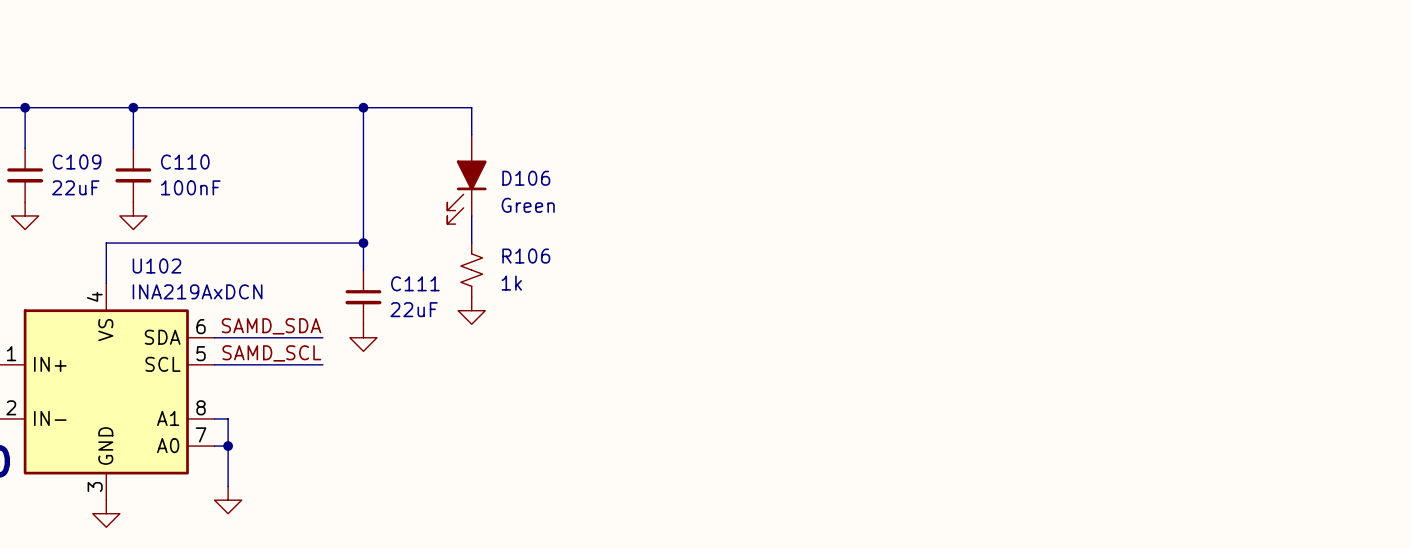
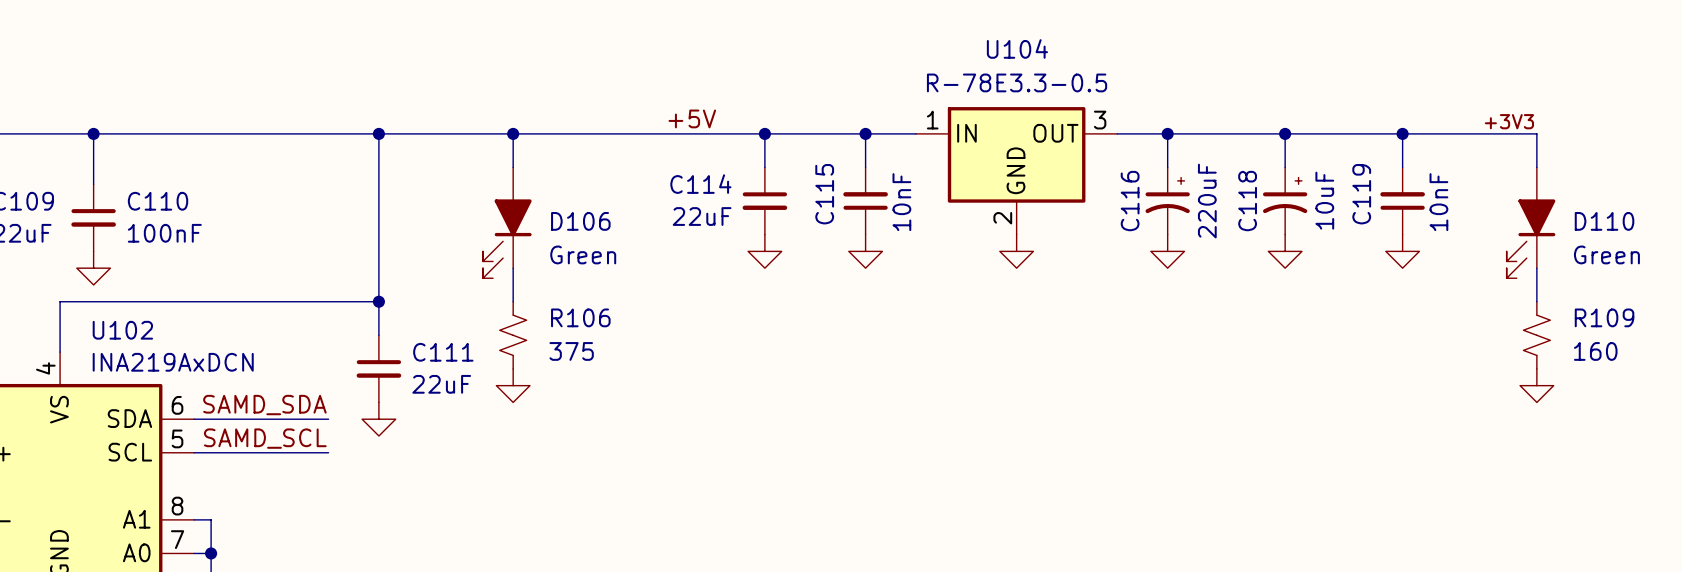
label: none -> +5V (692, 118)
label: none -> +3V3 (1509, 121)
wire: none -> (513, 133) (915, 133)
junction: none -> (513, 133)
wire: none -> (764, 133) (764, 167)
junction: none -> (764, 133)
wire: none -> (865, 133) (865, 167)
junction: none -> (865, 133)
wire: none -> (1117, 133) (1536, 133) (1536, 167)
wire: none -> (1167, 133) (1167, 167)
junction: none -> (1167, 133)
wire: none -> (1285, 133) (1285, 167)
junction: none -> (1285, 133)
wire: none -> (1402, 133) (1402, 167)
junction: none -> (1402, 133)
U104: none -> R-78E3.3-0.5 (1016, 170)
C114: none -> 22uF (764, 201)
C115: none -> 10nF (865, 201)
C116: none -> 220uF (1167, 201)
C118: none -> 10uF (1285, 201)
C119: none -> 10nF (1402, 201)
D110: none -> Green (1531, 222)
power symbol: none -> (764, 251)
power symbol: none -> (865, 251)
power symbol: none -> (1016, 251)
power symbol: none -> (1167, 251)
power symbol: none -> (1285, 251)
power symbol: none -> (1402, 251)
wire: none -> (1536, 268) (1536, 301)
R109: none -> 160 (1536, 335)
R106 value: 1k (511, 283) -> 375 (571, 351)
power symbol: none -> (1536, 385)

